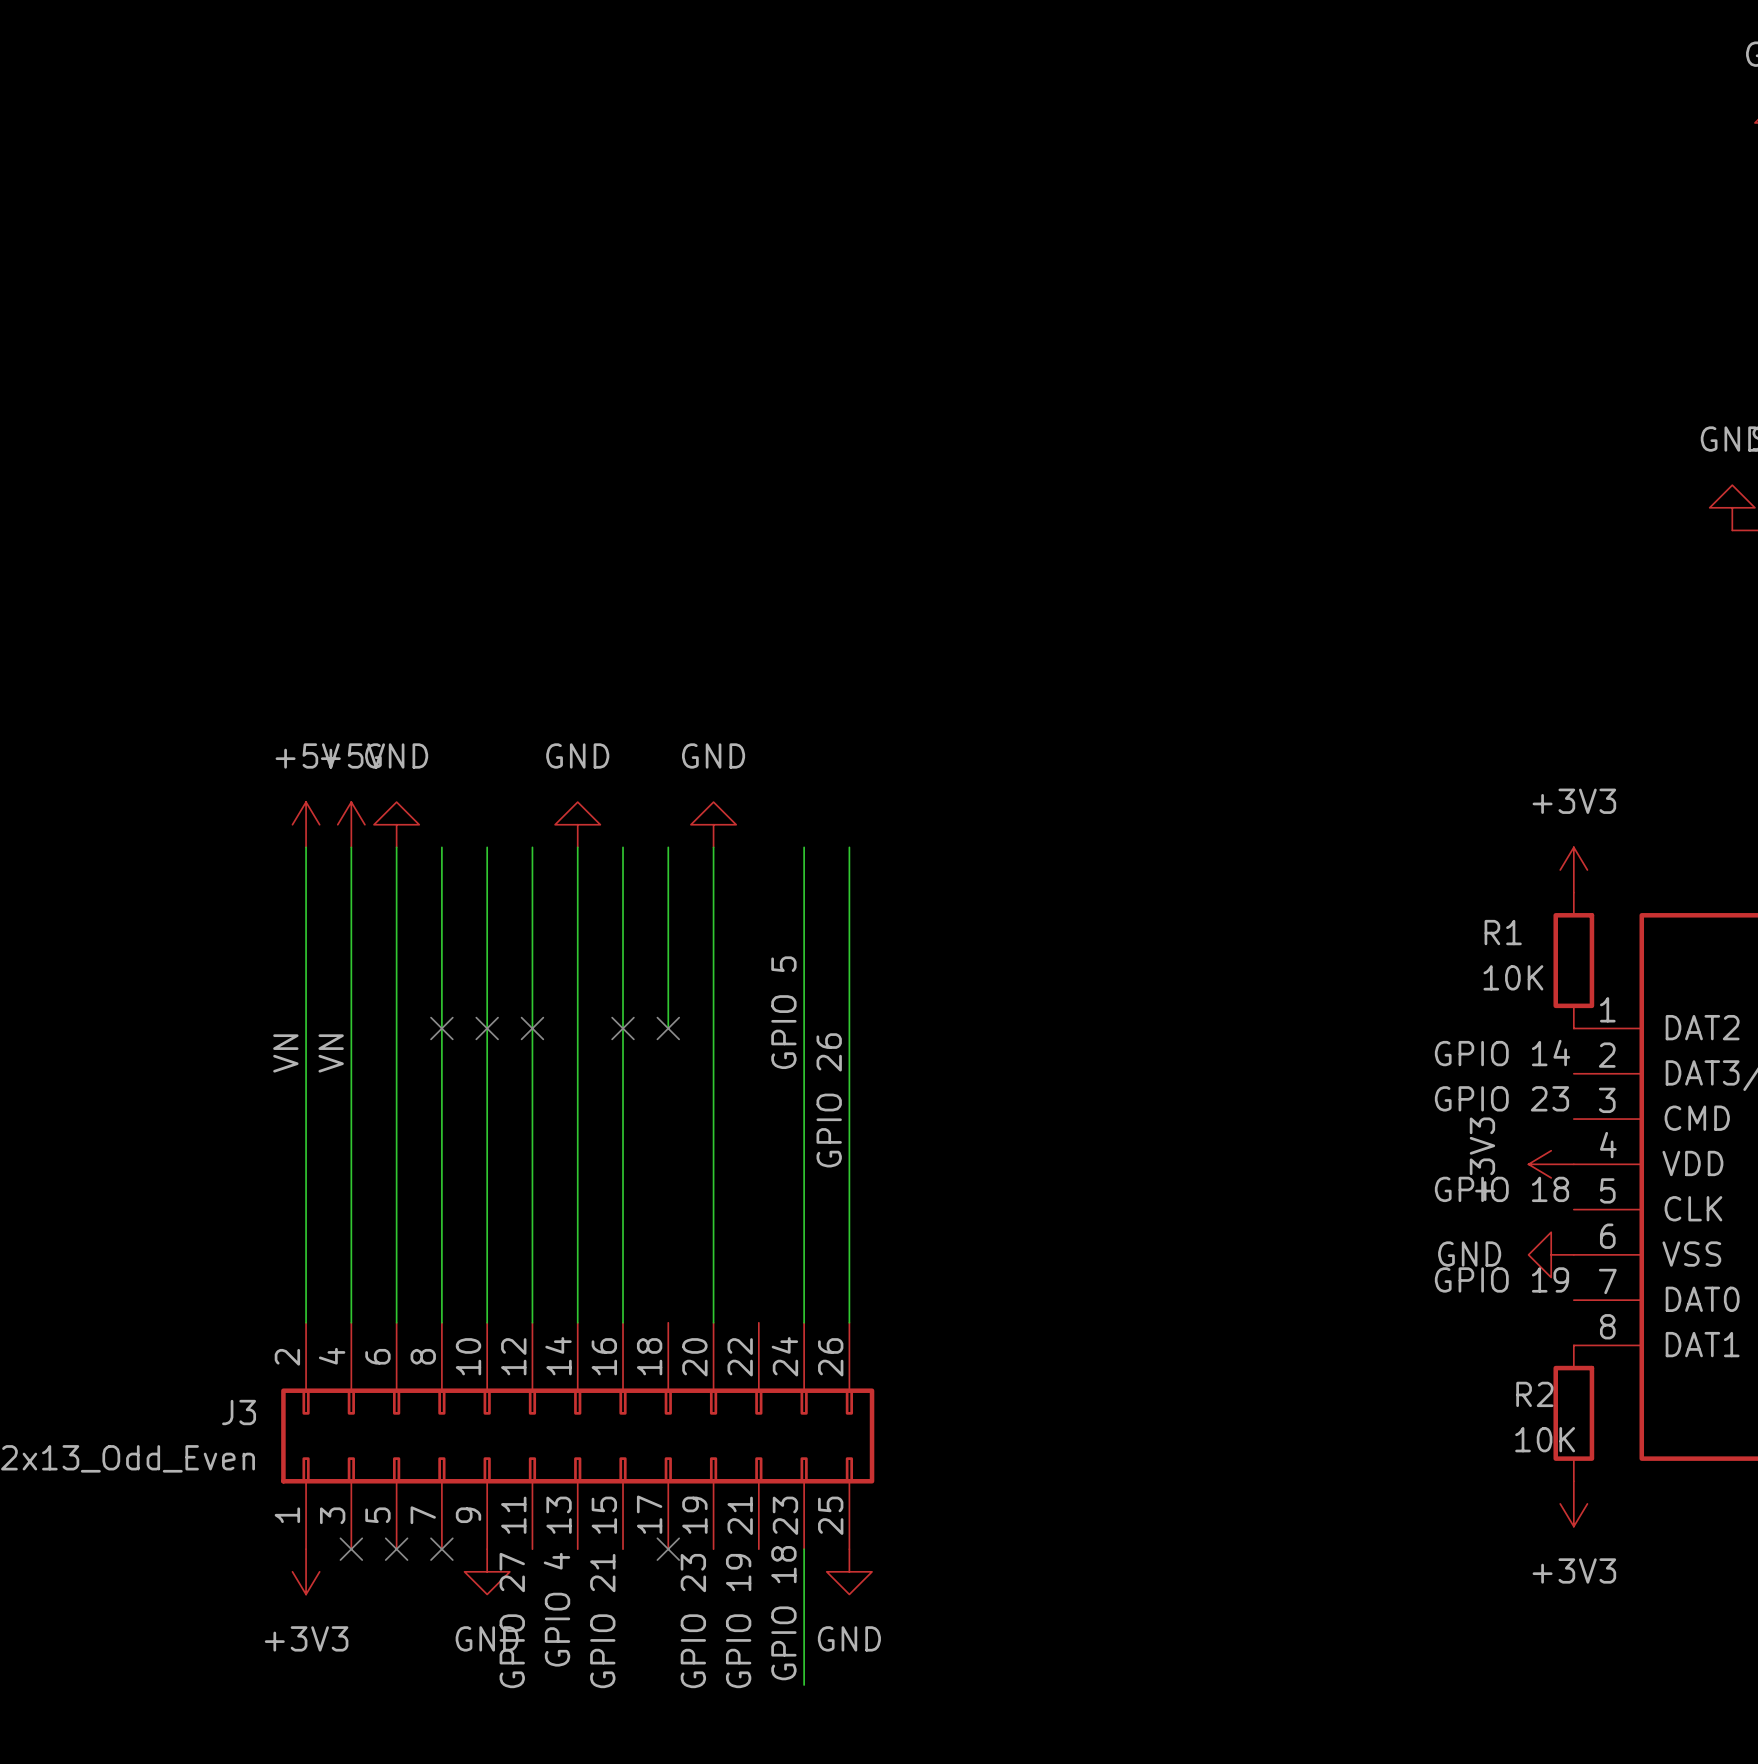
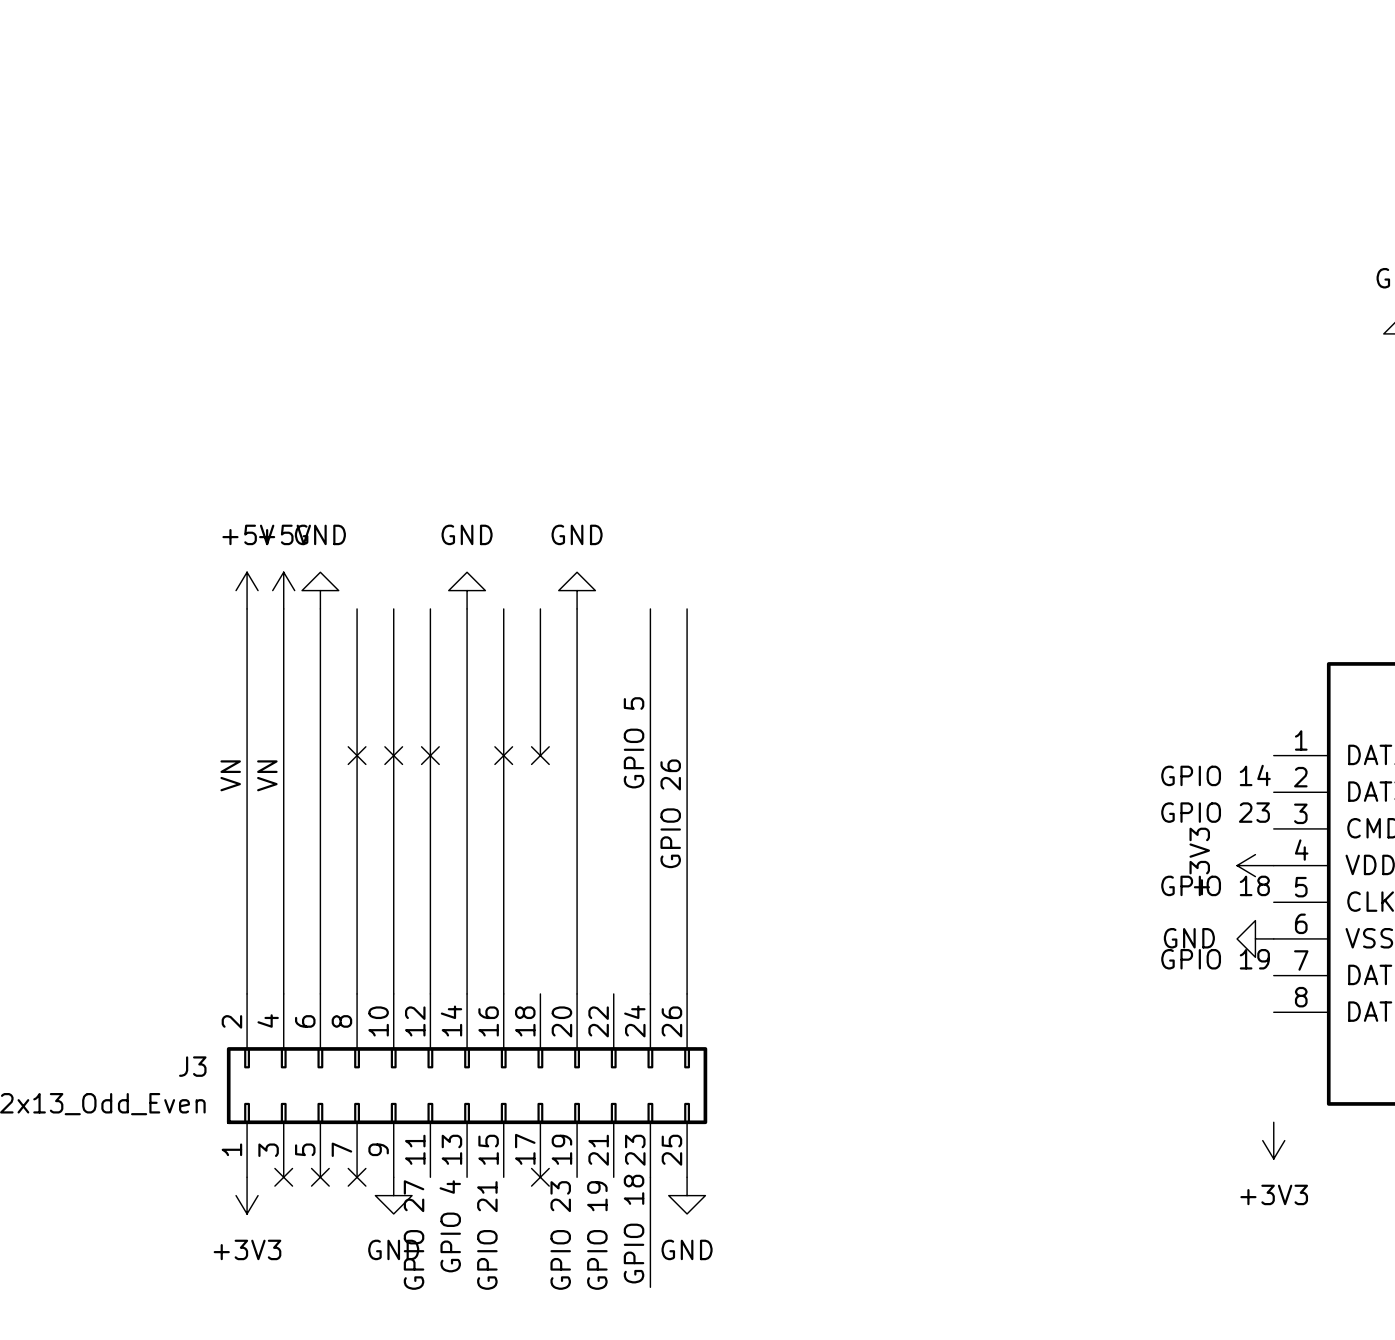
power symbol: +3V3 (1573, 870) -> none
R1: 10K (1573, 960) -> none
R2: 10K (1573, 1413) -> none

